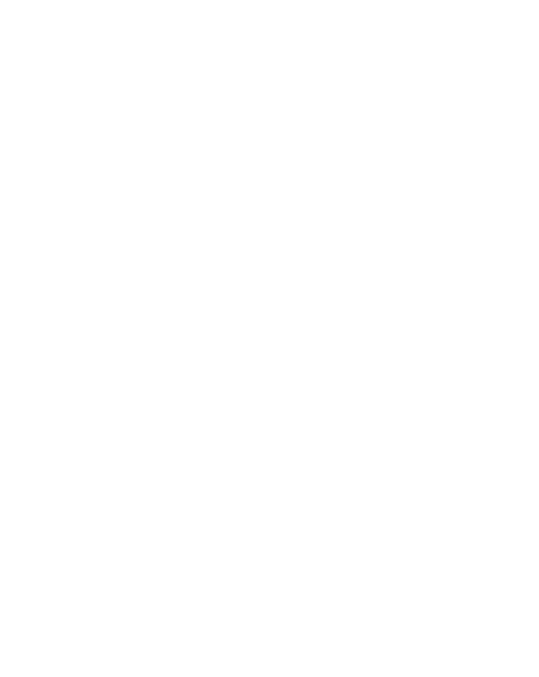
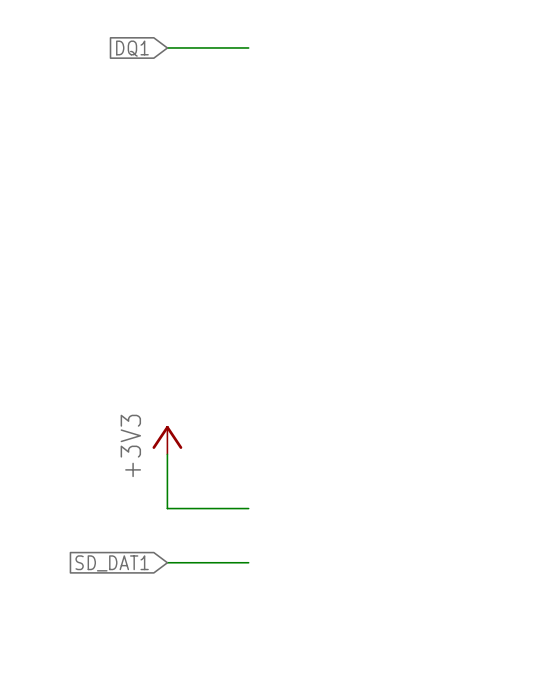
wire: none -> (167, 47) (248, 47)
global label: none -> DQ1 (132, 48)
power symbol: none -> +3V3 (167, 440)
wire: none -> (167, 454) (167, 508) (248, 508)
wire: none -> (167, 562) (248, 562)
global label: none -> SD_DAT1 (112, 563)

